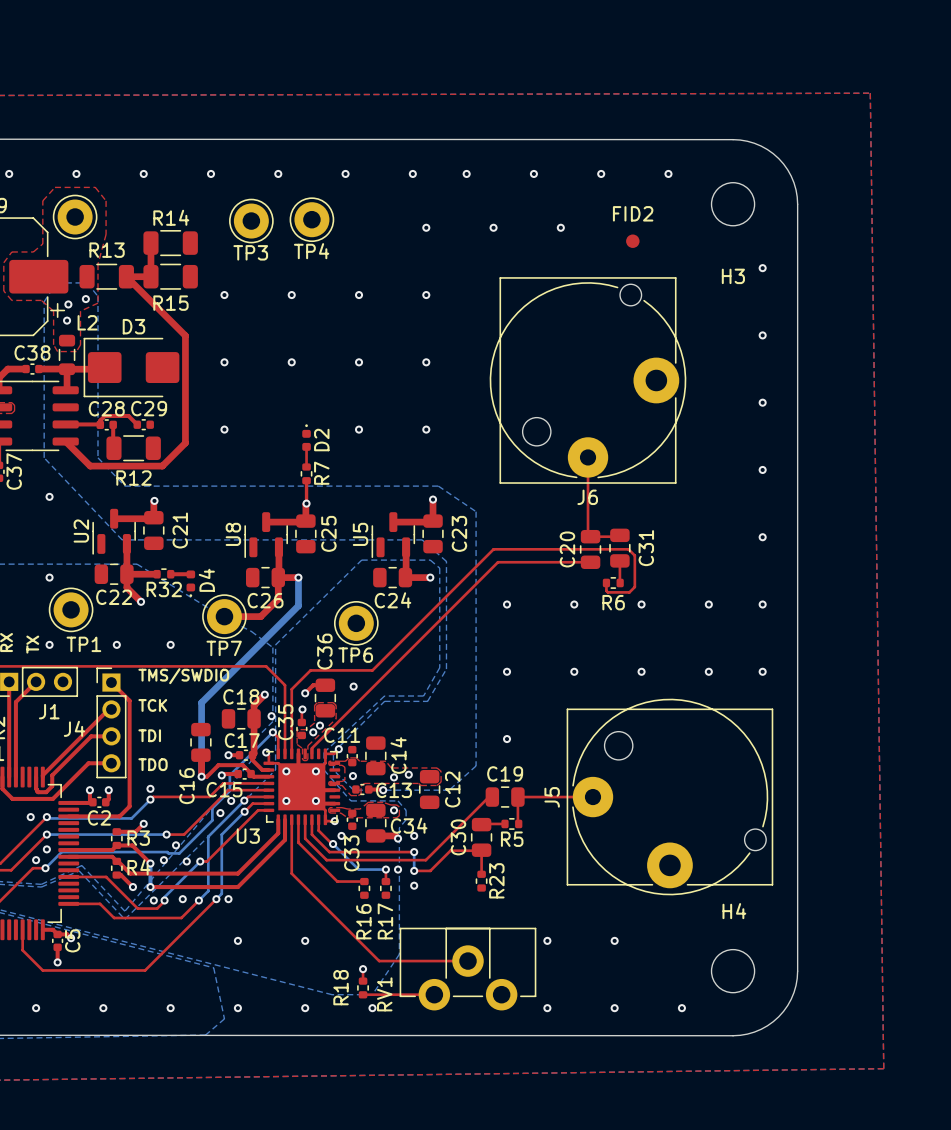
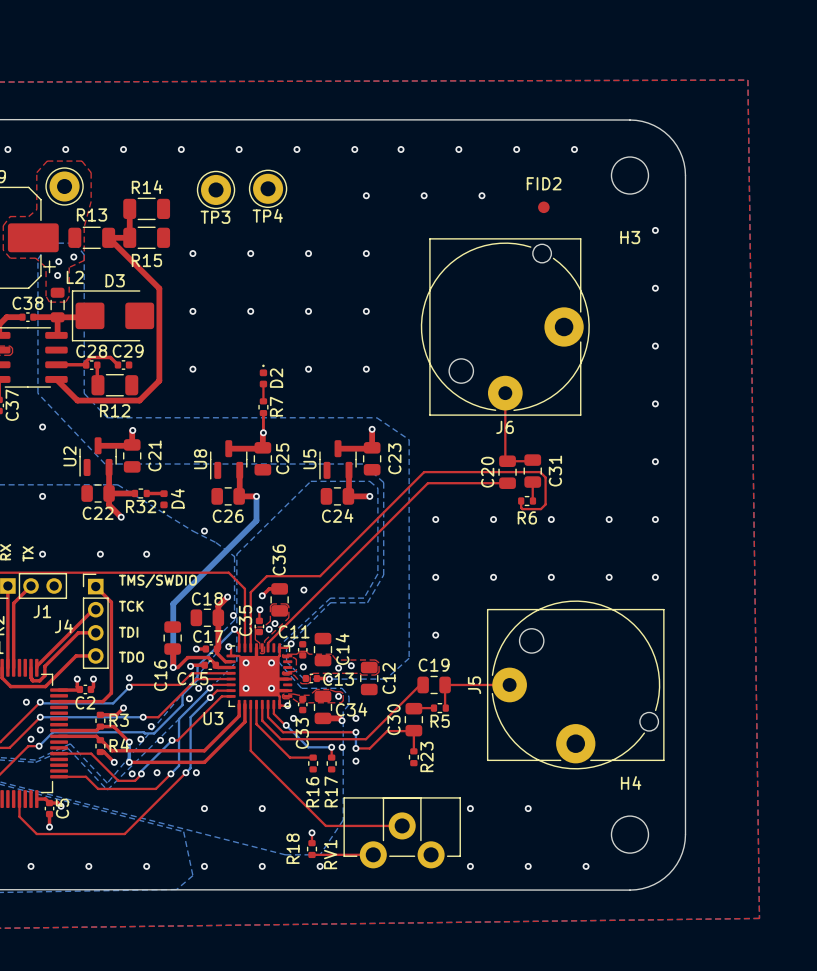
top track: (278, 577) (278, 599) (260, 616) (224, 616) -> none
TP1: (71, 609) -> none
TP7: (224, 616) -> none
via: none -> (204, 531)
TP6: (356, 623) -> none

